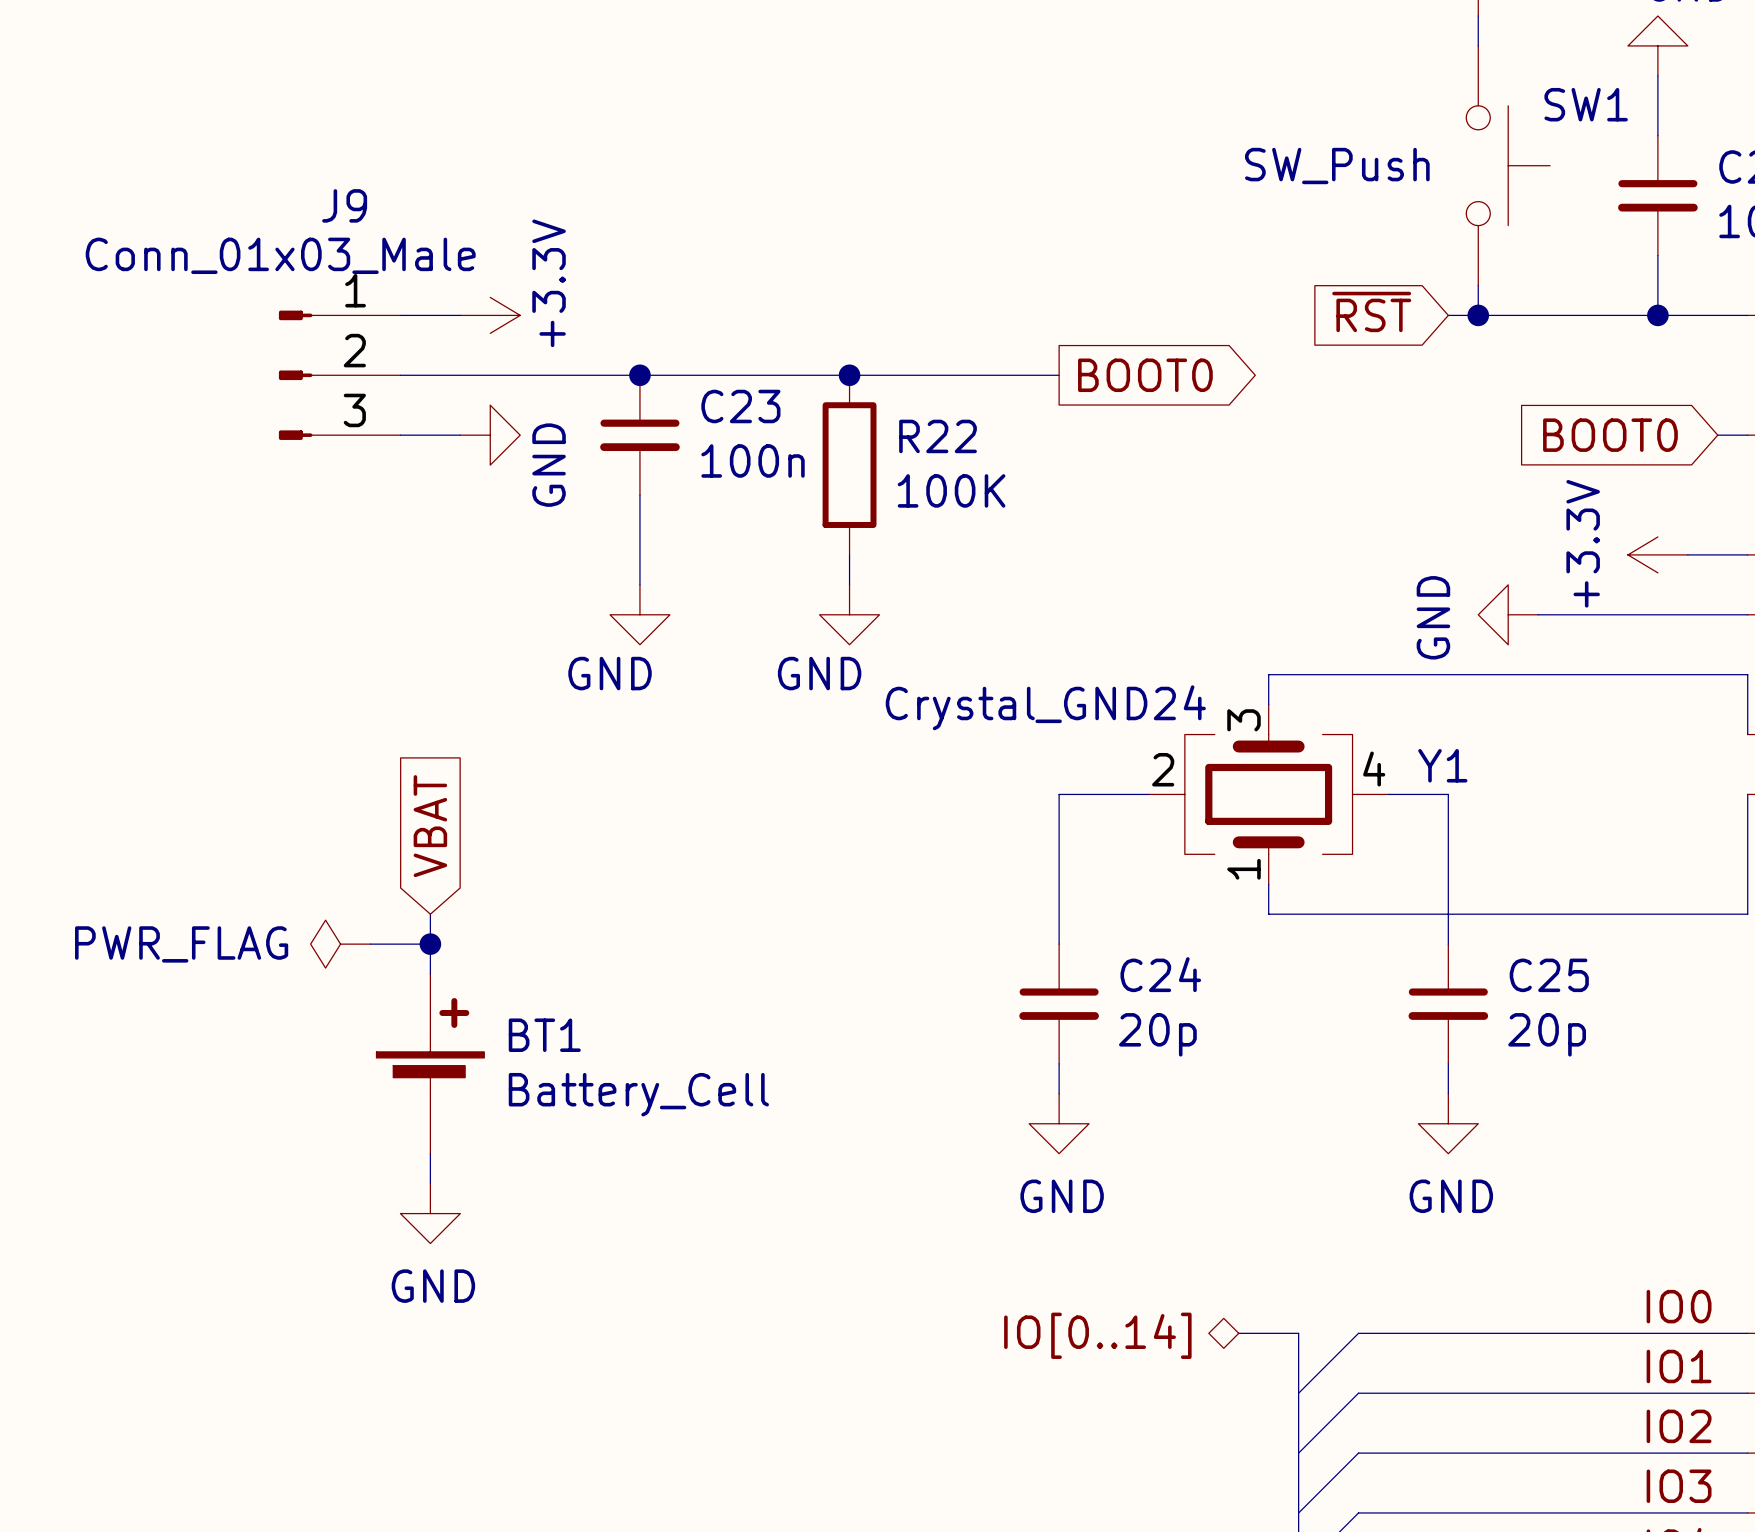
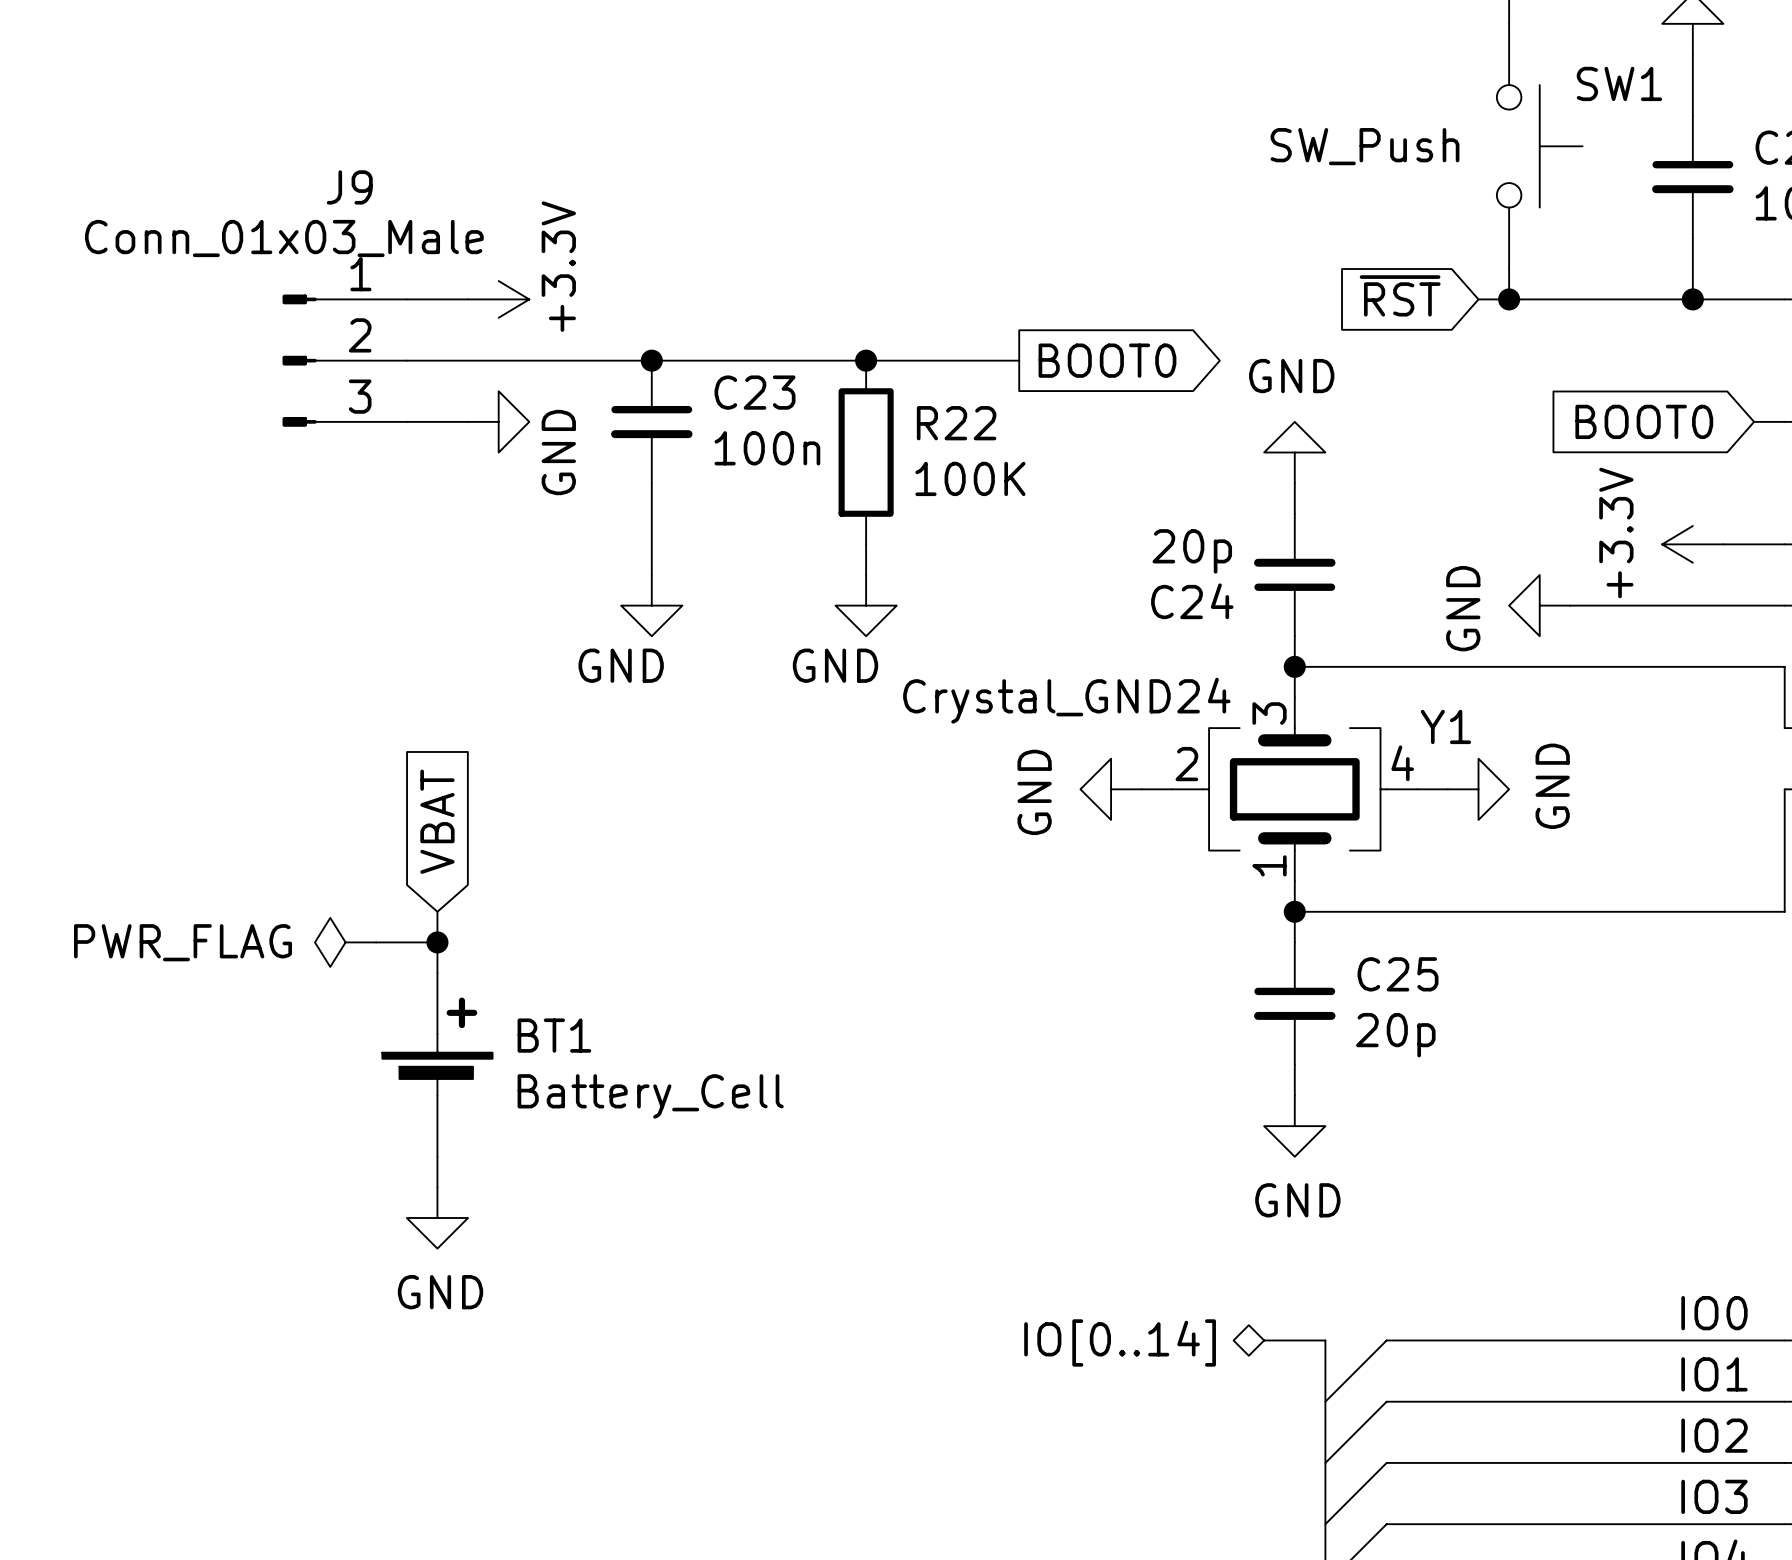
wire: (999, 375) (1059, 375) -> none
global label position: BOOT0 (1145, 375) -> BOOT0 (1107, 360)
power symbol: none -> GND (1294, 452)
wire: none -> (1294, 483) (1294, 513)
wire: none -> (1294, 636) (1294, 666)
junction: none -> (1294, 666)
Y1 name position: Y1 (1442, 765) -> Y1 (1445, 726)
power symbol: none -> GND (1111, 789)
wire: (1118, 794) (1059, 794) (1059, 944) -> none
wire: (1418, 794) (1448, 794) (1448, 944) -> none
power symbol: none -> GND (1478, 789)
junction: none -> (1294, 911)
C24 rotation: 0° (1059, 1004) -> 180° (1294, 574)
C24 position: (1059, 1004) -> (1294, 574)
C25 position: (1448, 1004) -> (1294, 1003)
wire: (1059, 1063) (1059, 1093) -> (1294, 911) (1294, 942)
wire: (1448, 1063) (1448, 1093) -> (1294, 1064) (1294, 1095)
power symbol: GND (1059, 1123) -> none
power symbol: none -> GND (1294, 1126)
power symbol: GND (1448, 1123) -> none

